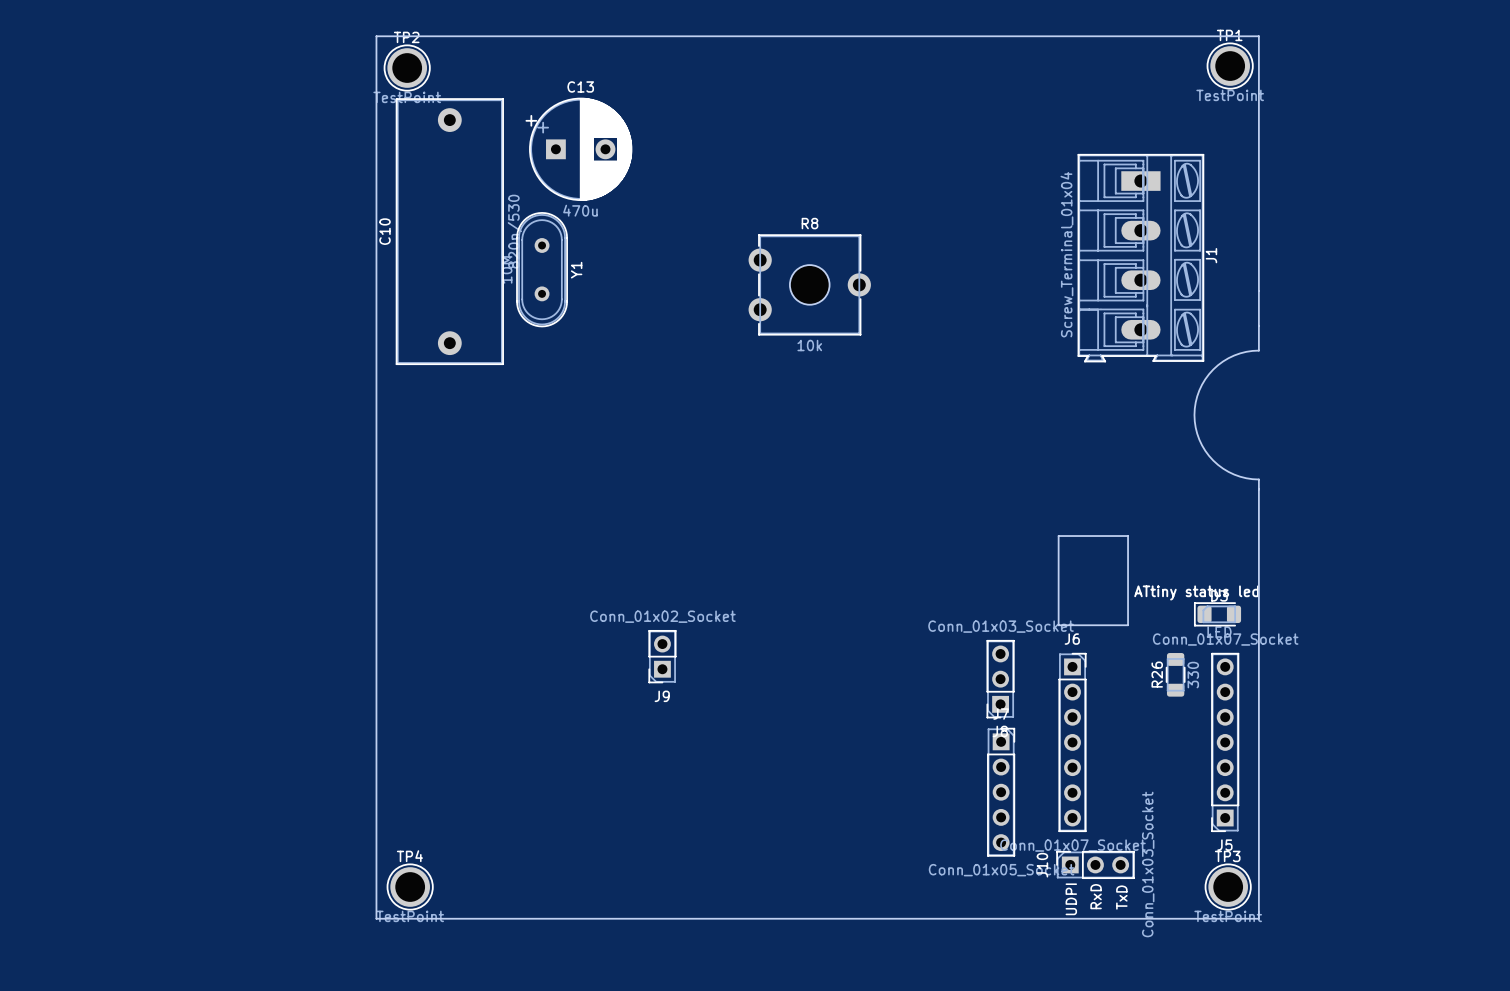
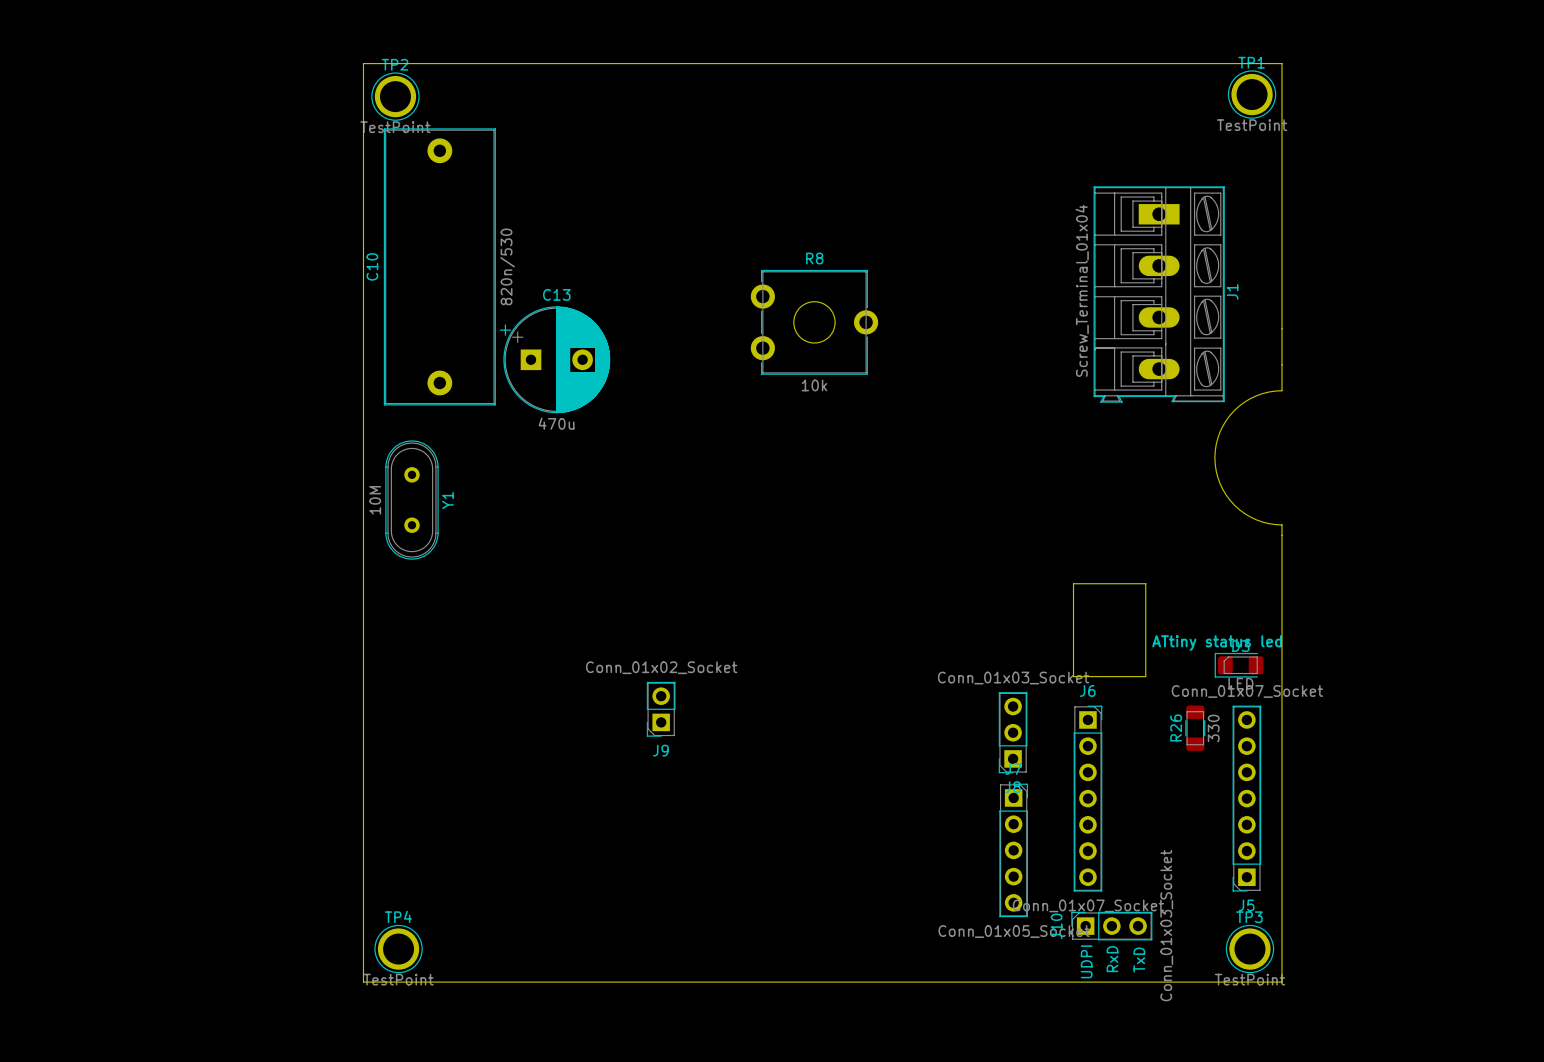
C13 position: (578, 149) -> (554, 359)
Y1 position: (542, 269) -> (411, 500)

